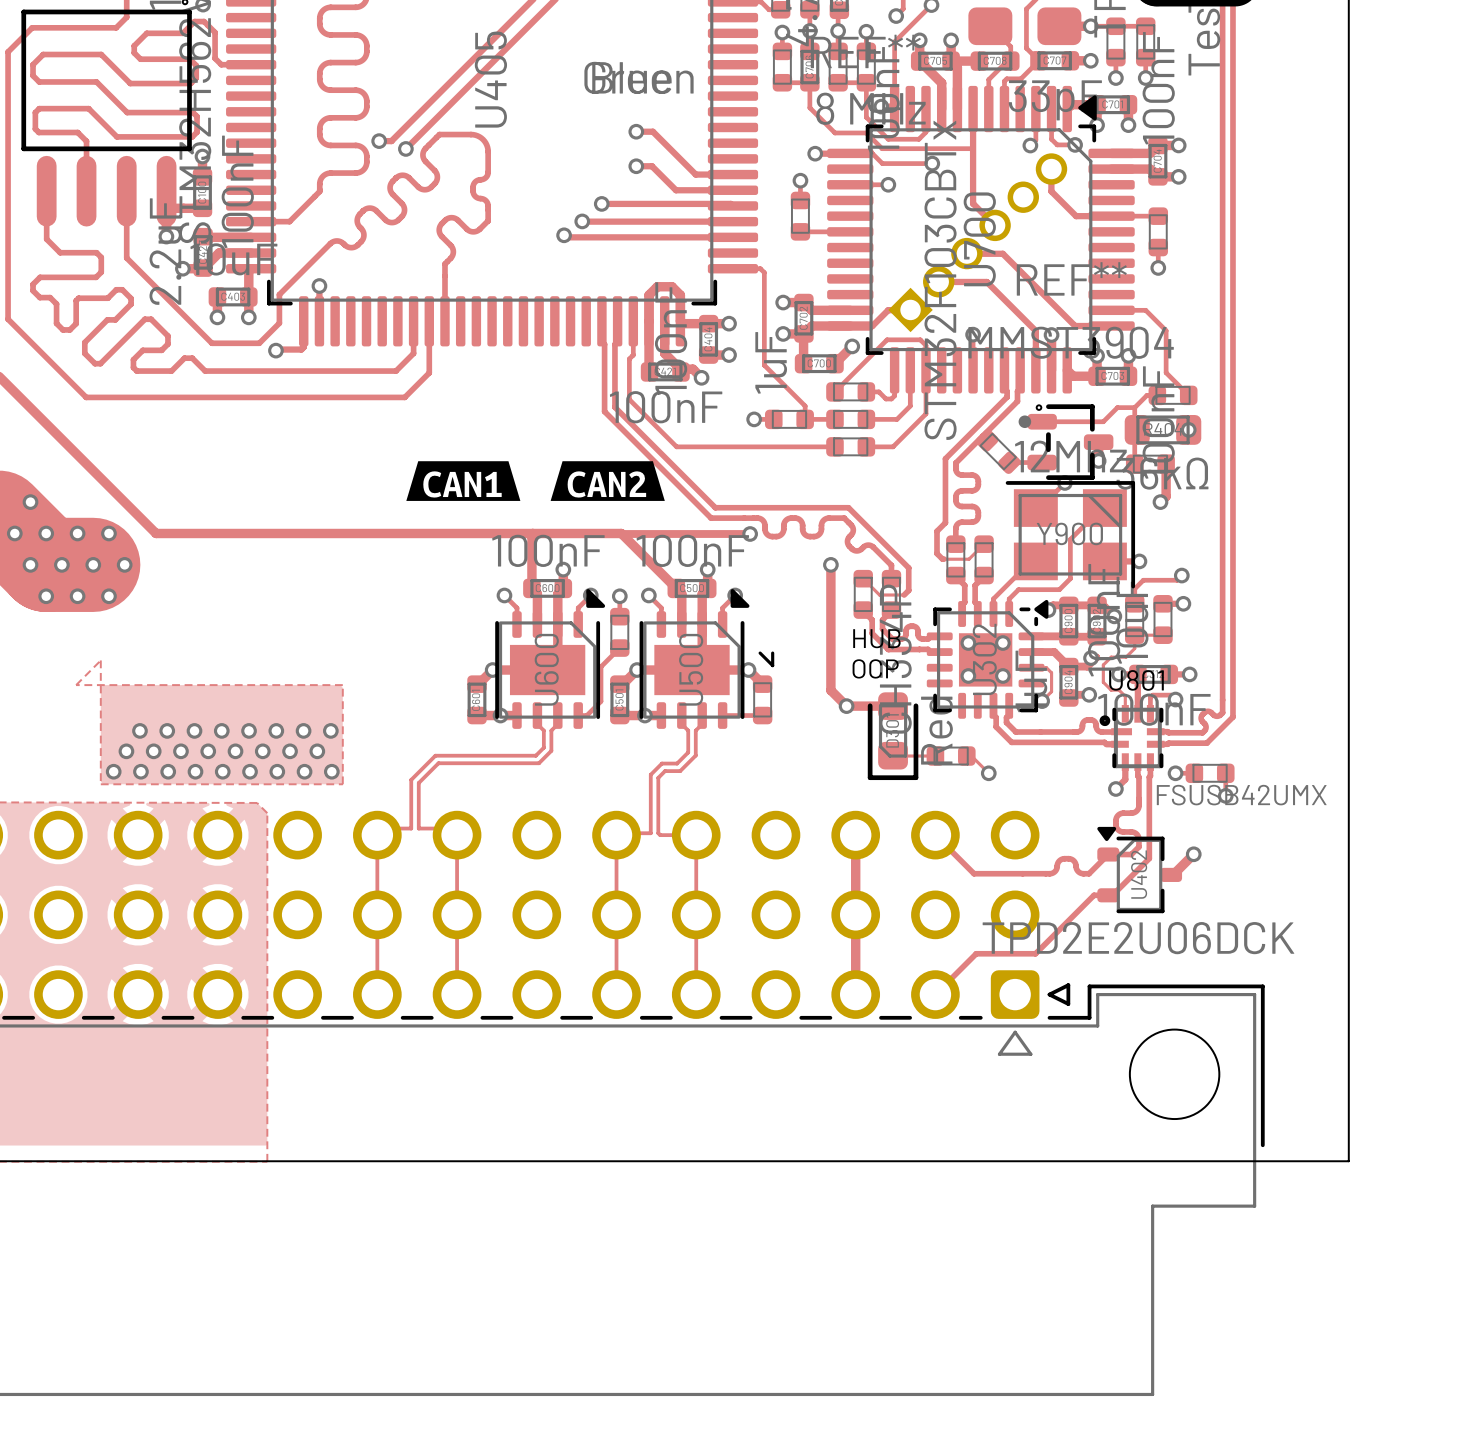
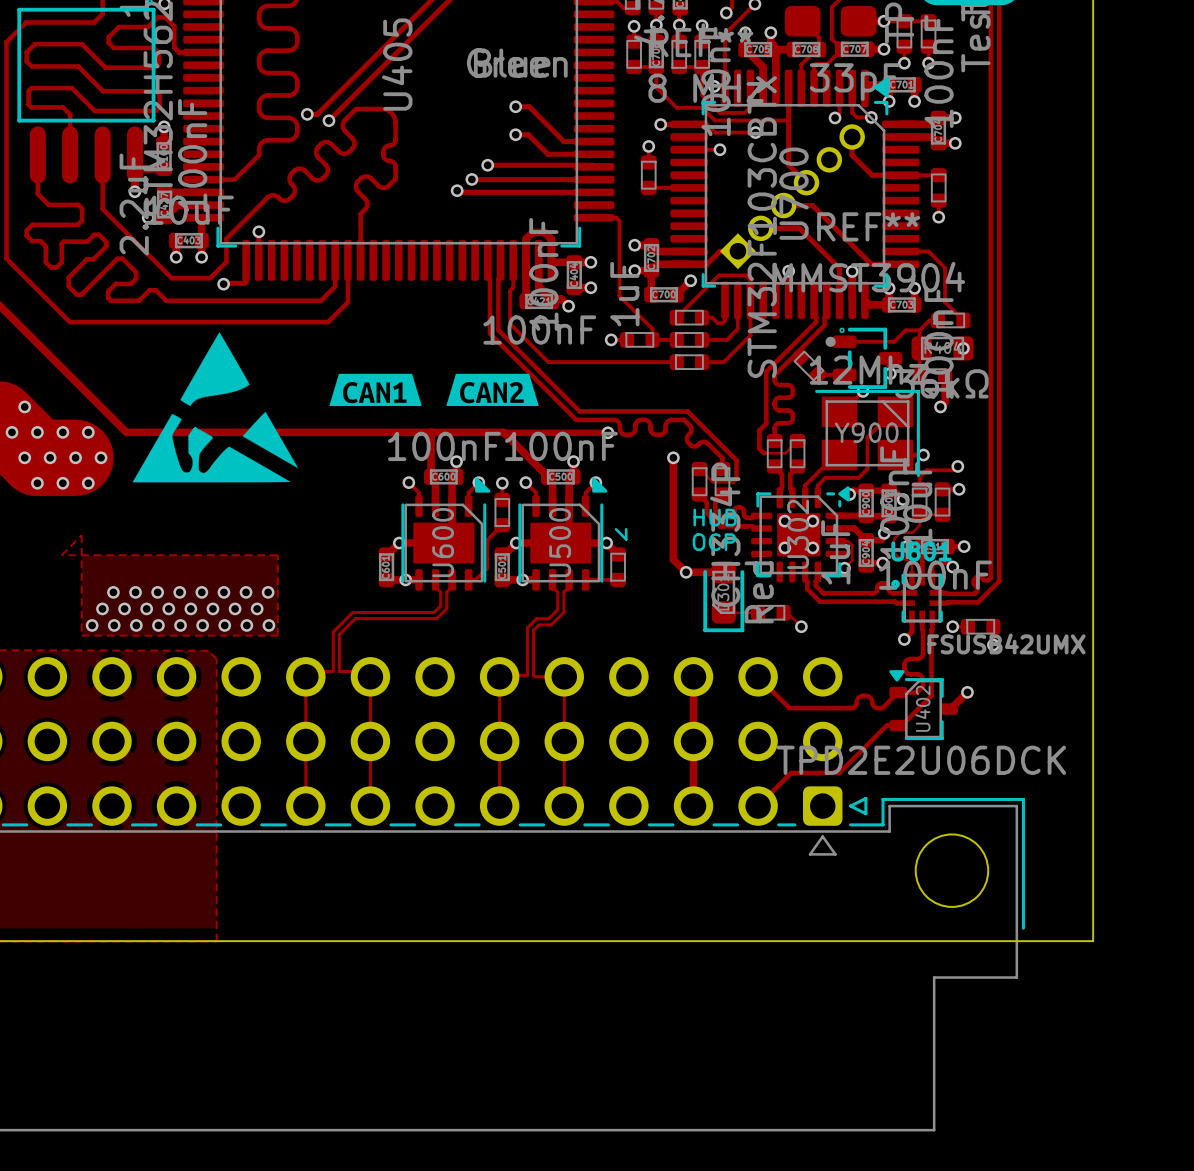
drawing: none -> [132, 332, 298, 483]

